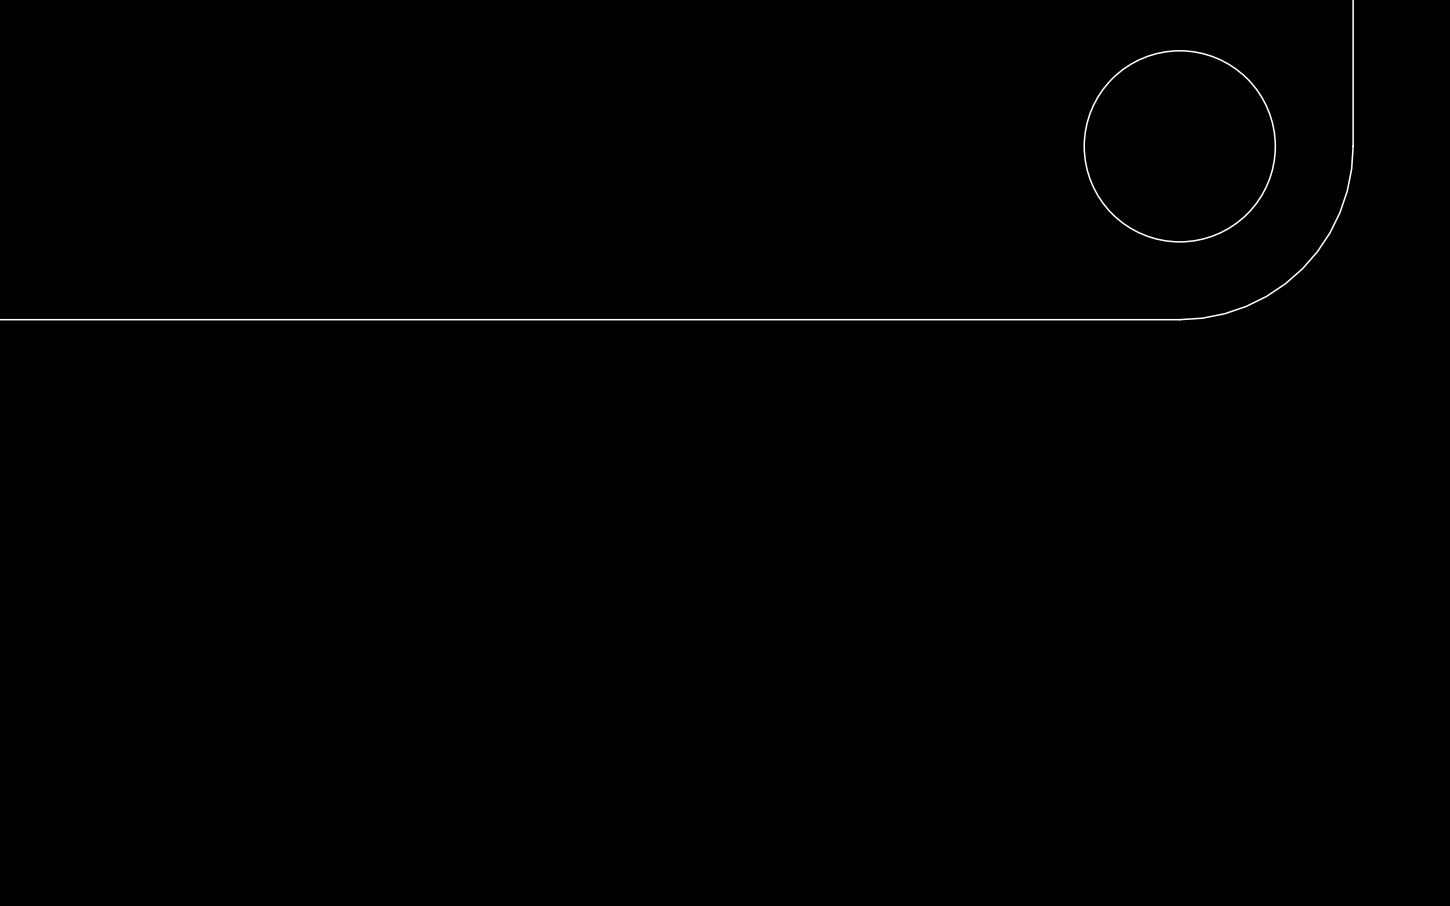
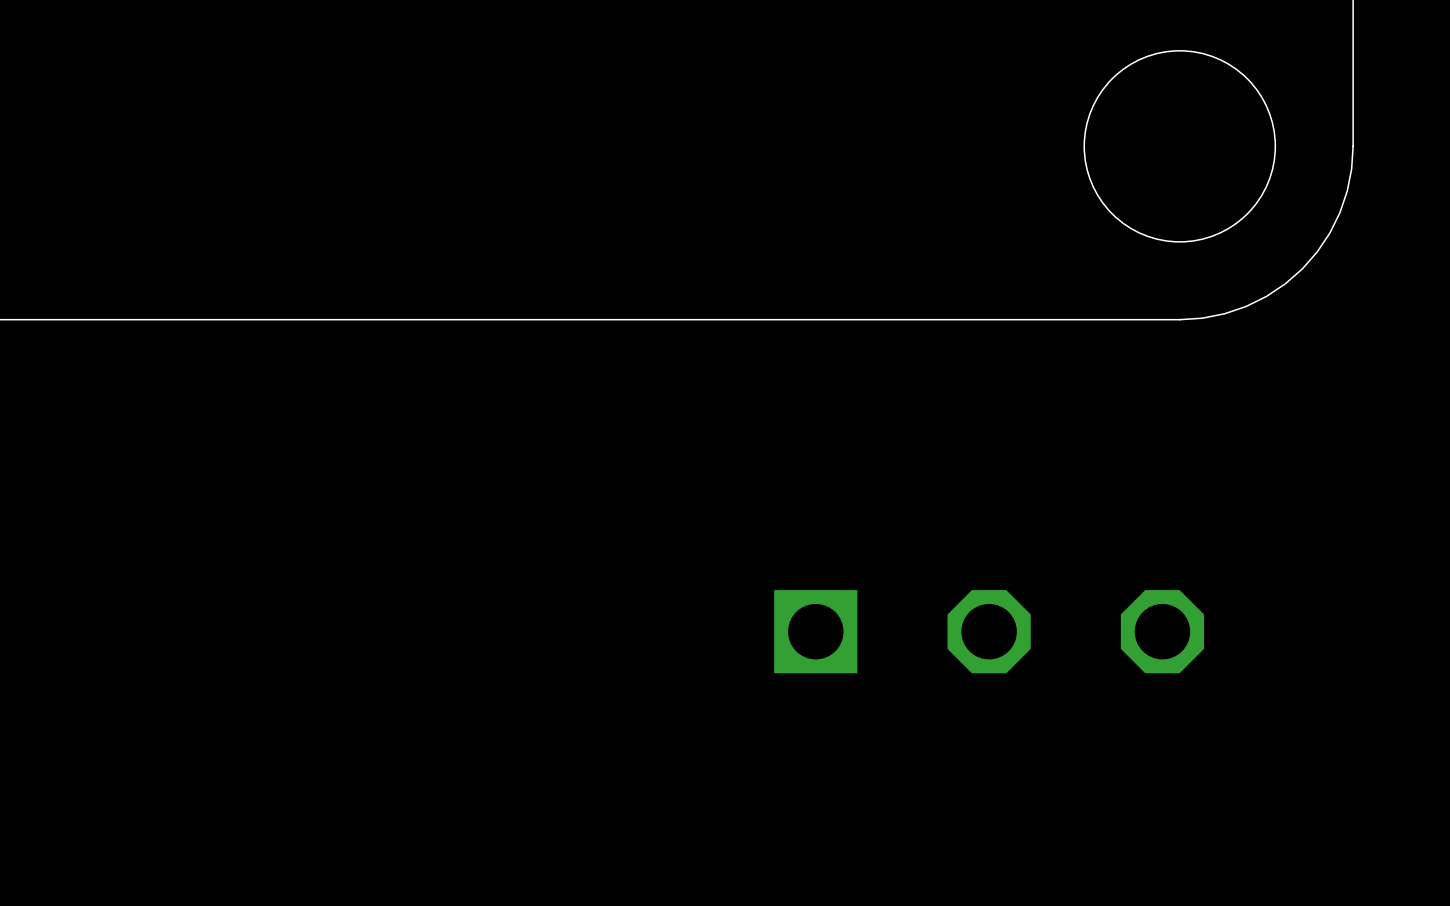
part: none -> (989, 631)

